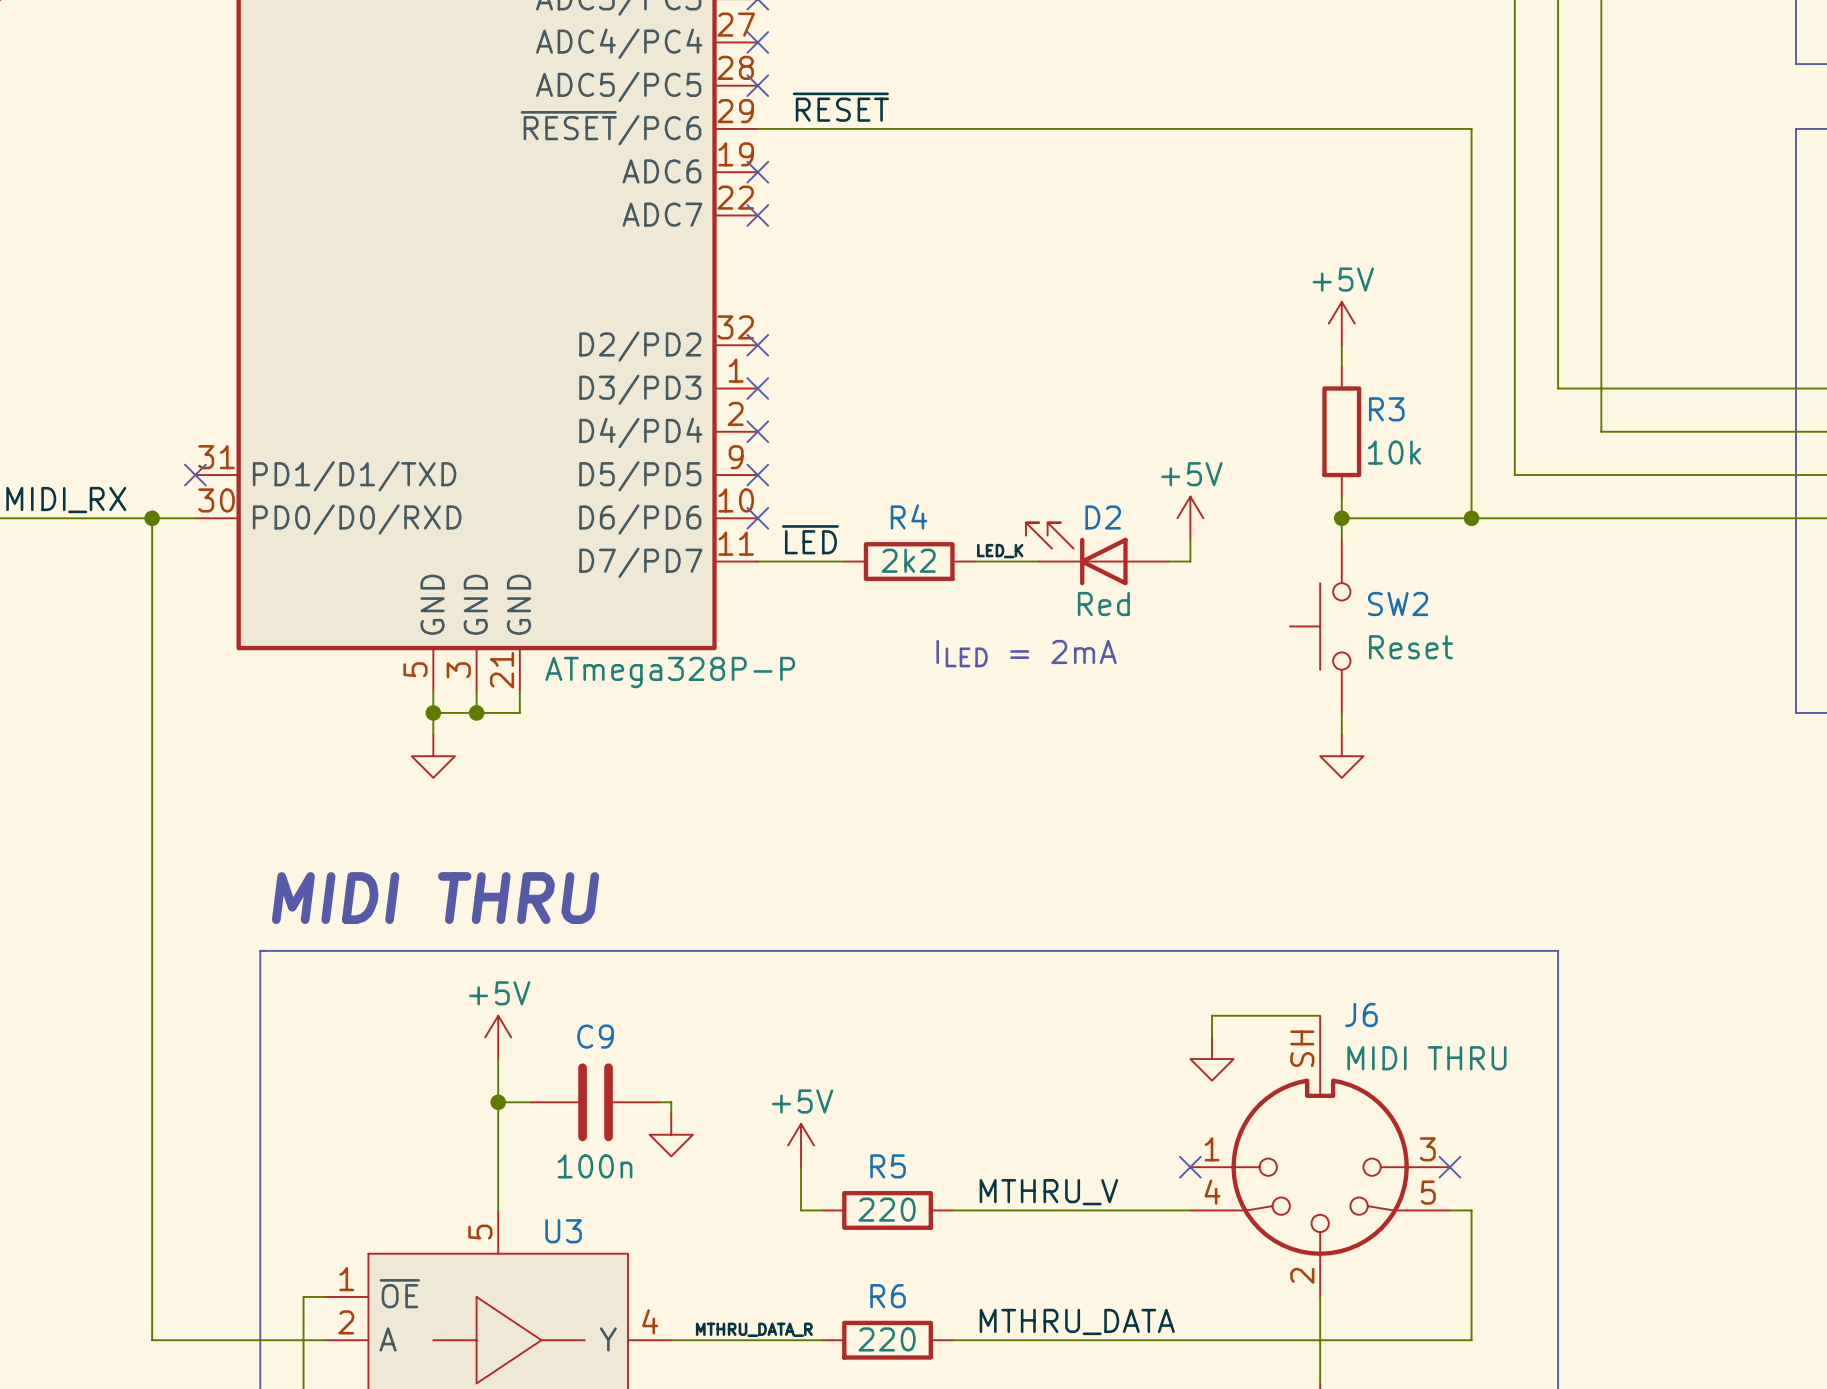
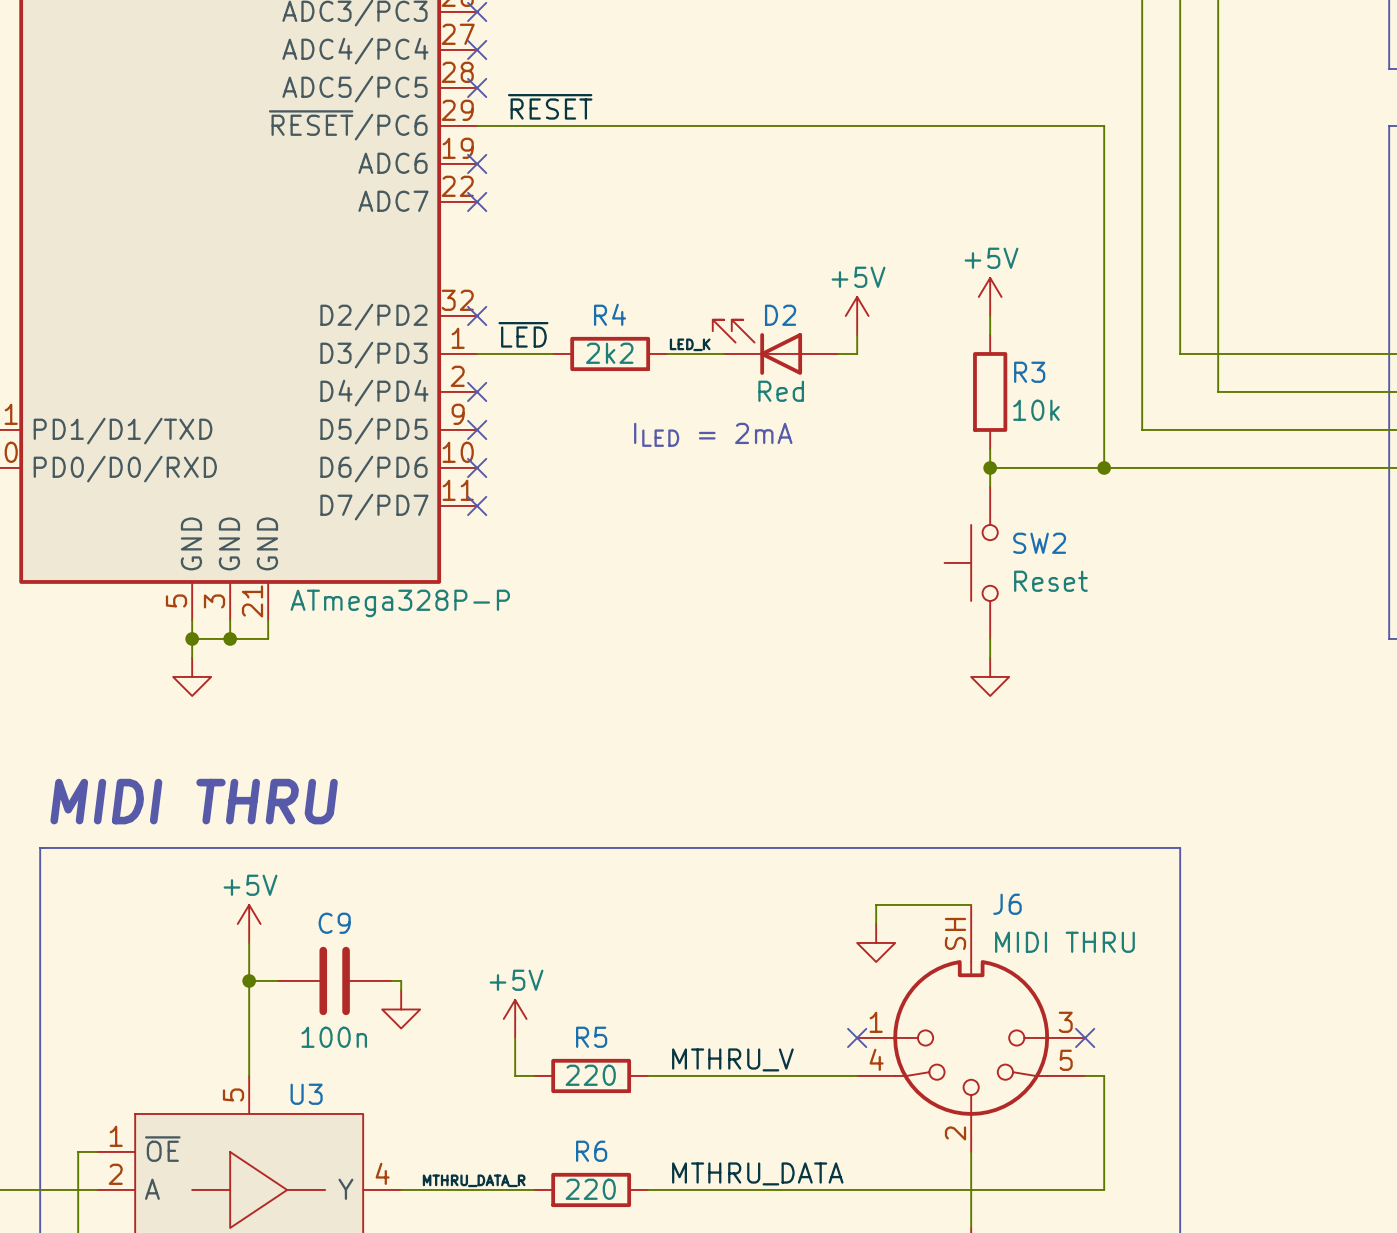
no-connect mark: (757, 388) -> none
power symbol position: +5V (1190, 518) -> +5V (857, 315)
label position: ~{LED} (810, 539) -> ~{LED} (523, 334)
wire: (1190, 539) (1190, 561) (1168, 561) -> (857, 334) (857, 353) (838, 353)
label position: LED_K (1000, 551) -> LED_K (690, 344)
D2 position: (1097, 553) -> (775, 347)
wire: (757, 561) (844, 561) -> (477, 353) (553, 353)
no-connect mark: none -> (477, 505)
R4 position: (909, 561) -> (610, 353)
wire: (974, 561) (1038, 561) -> (667, 353) (724, 353)
text position: ILED = 2mA (1026, 653) -> ILED = 2mA (713, 434)

